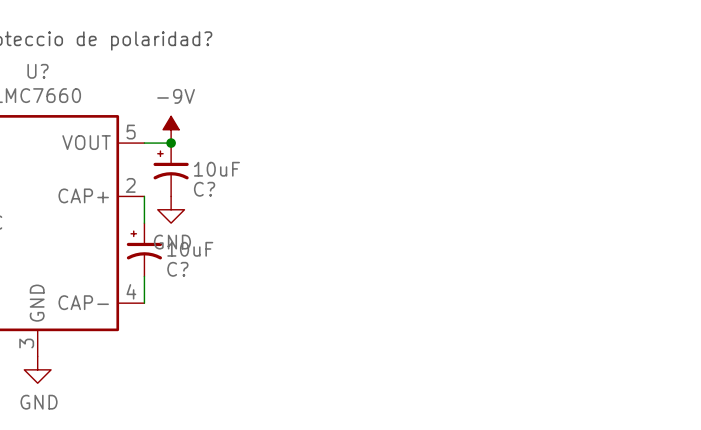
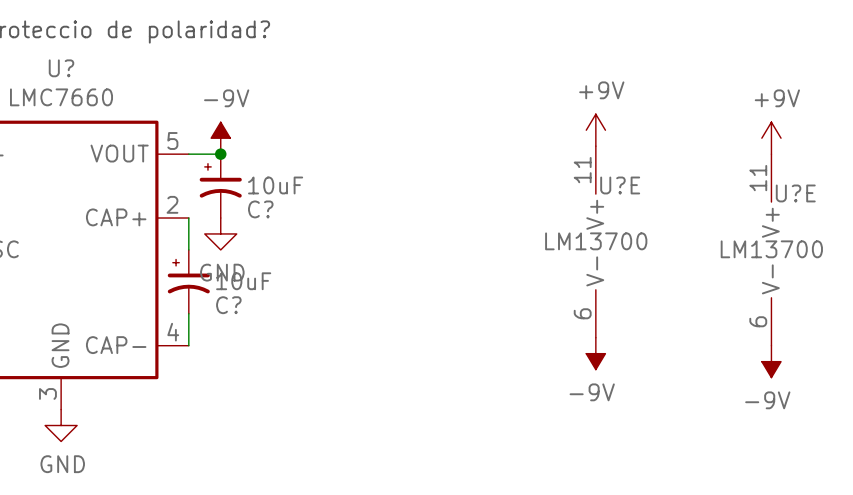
power symbol: none -> +9V (595, 130)
power symbol: none -> +9V (771, 138)
U?E: none -> LM13700 (595, 241)
U?E: none -> LM13700 (771, 249)
power symbol: none -> -9V (595, 353)
power symbol: none -> -9V (771, 361)

